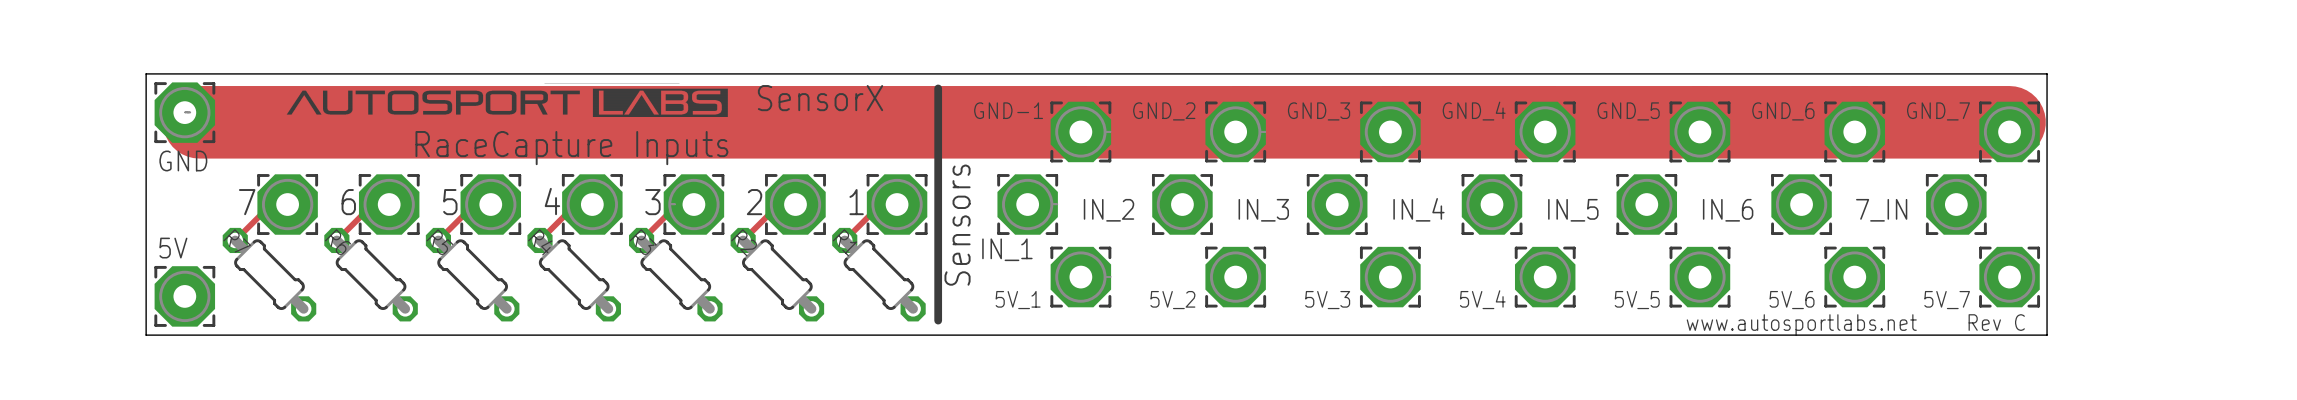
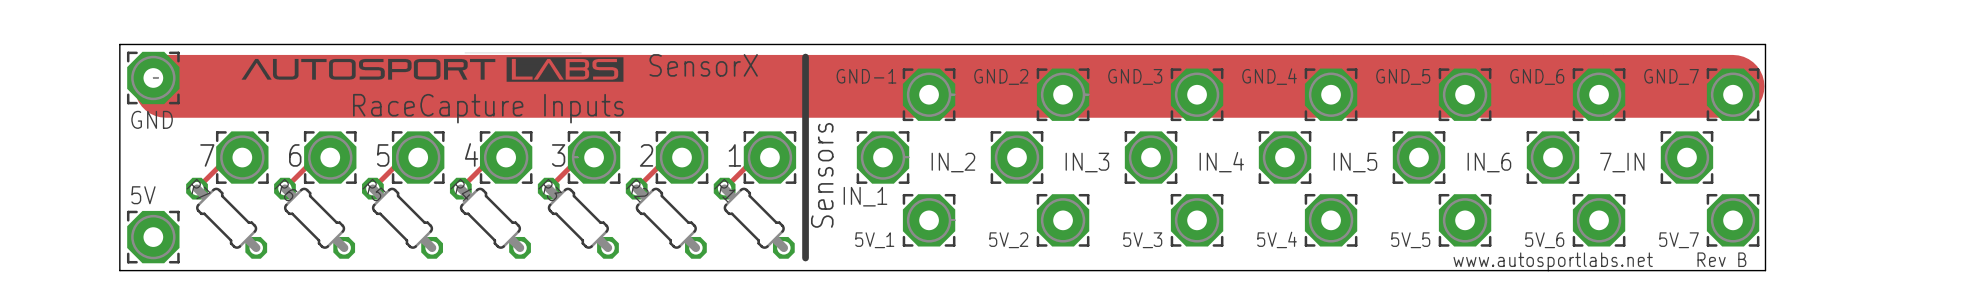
text: Rev C (1996, 322) -> Rev B (1721, 259)

